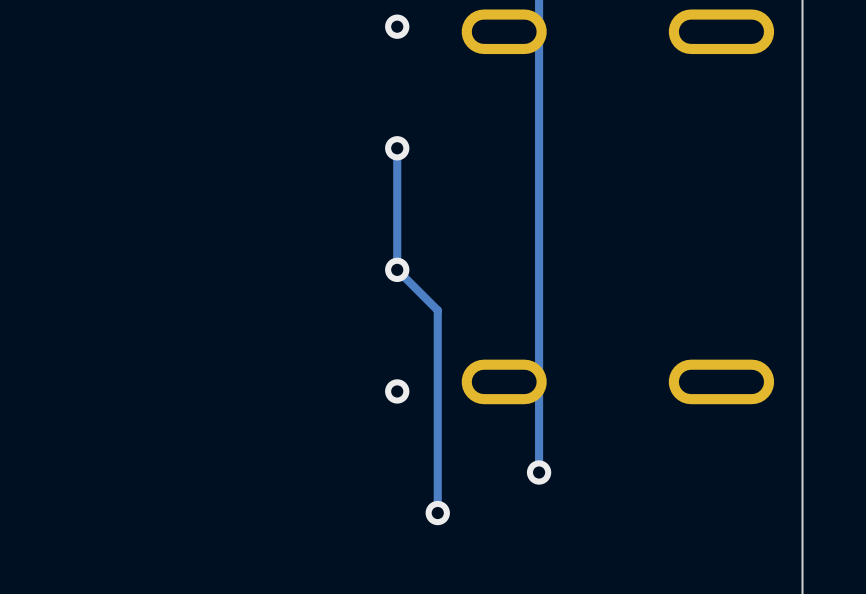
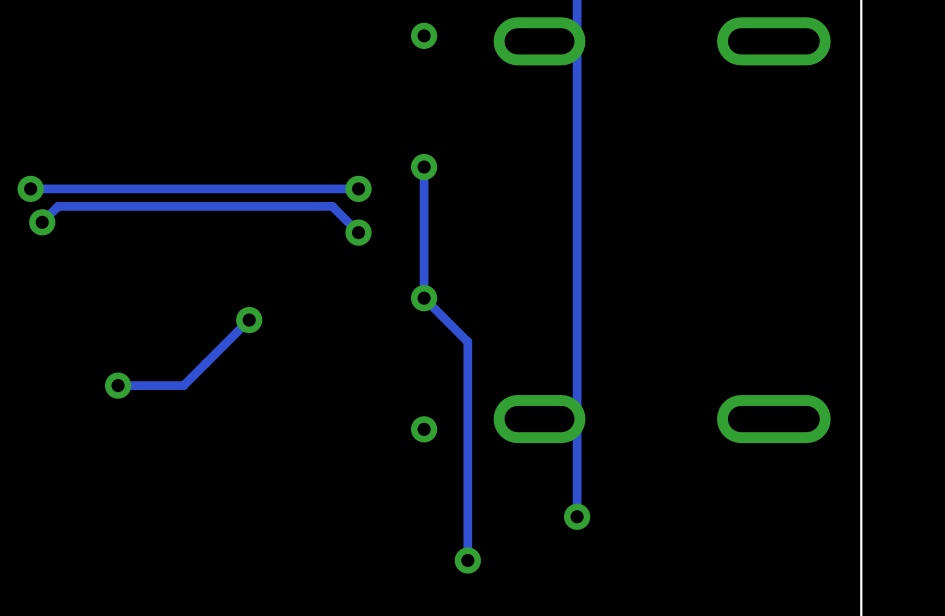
via: none -> (30, 188)
track: none -> (358, 188) (30, 188)
via: none -> (358, 188)
track: none -> (42, 222) (58, 206) (332, 206) (358, 232)
via: none -> (42, 222)
via: none -> (358, 232)
track: none -> (249, 320) (183, 385) (118, 385)
via: none -> (249, 320)
via: none -> (118, 385)

